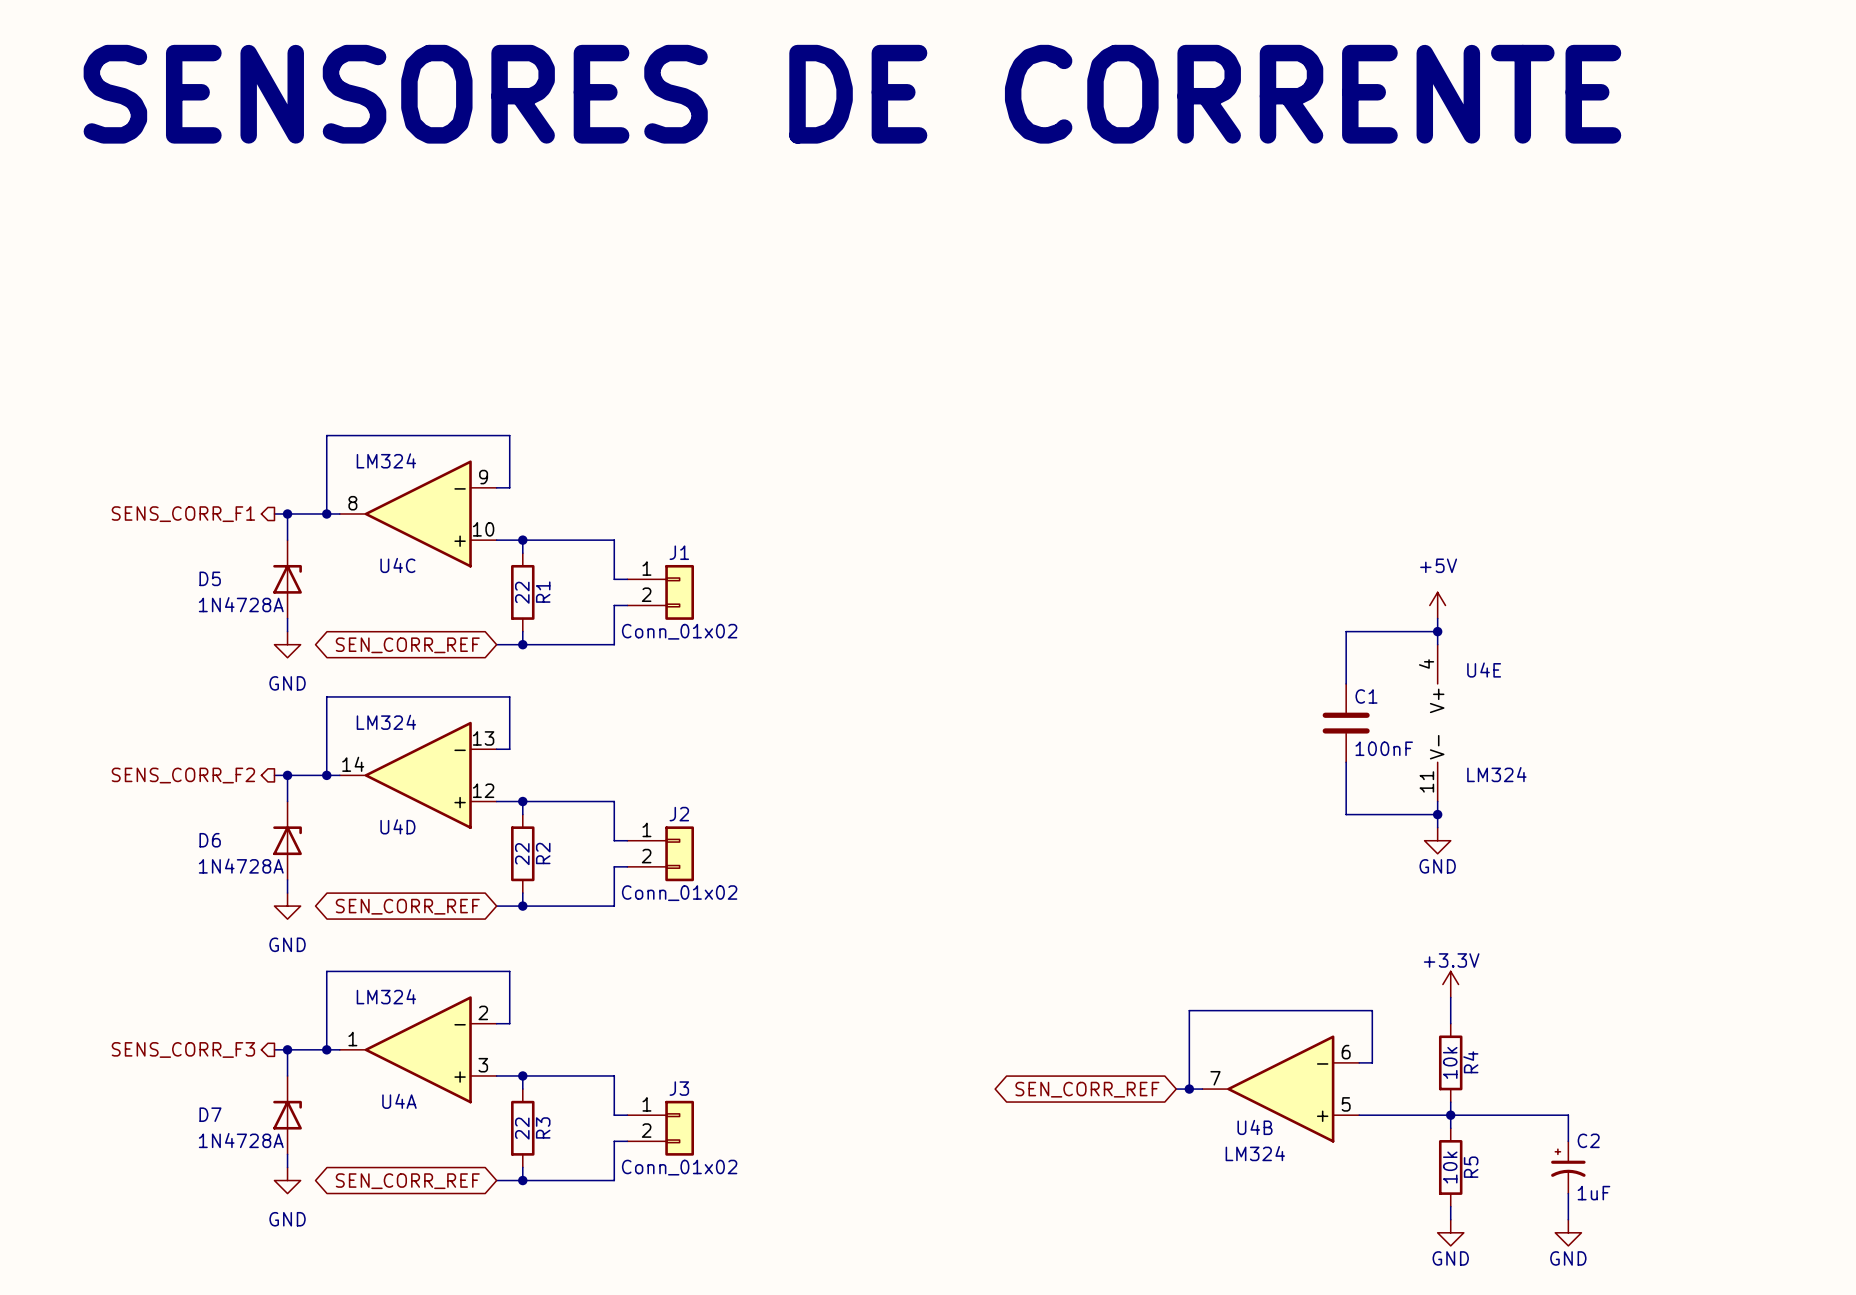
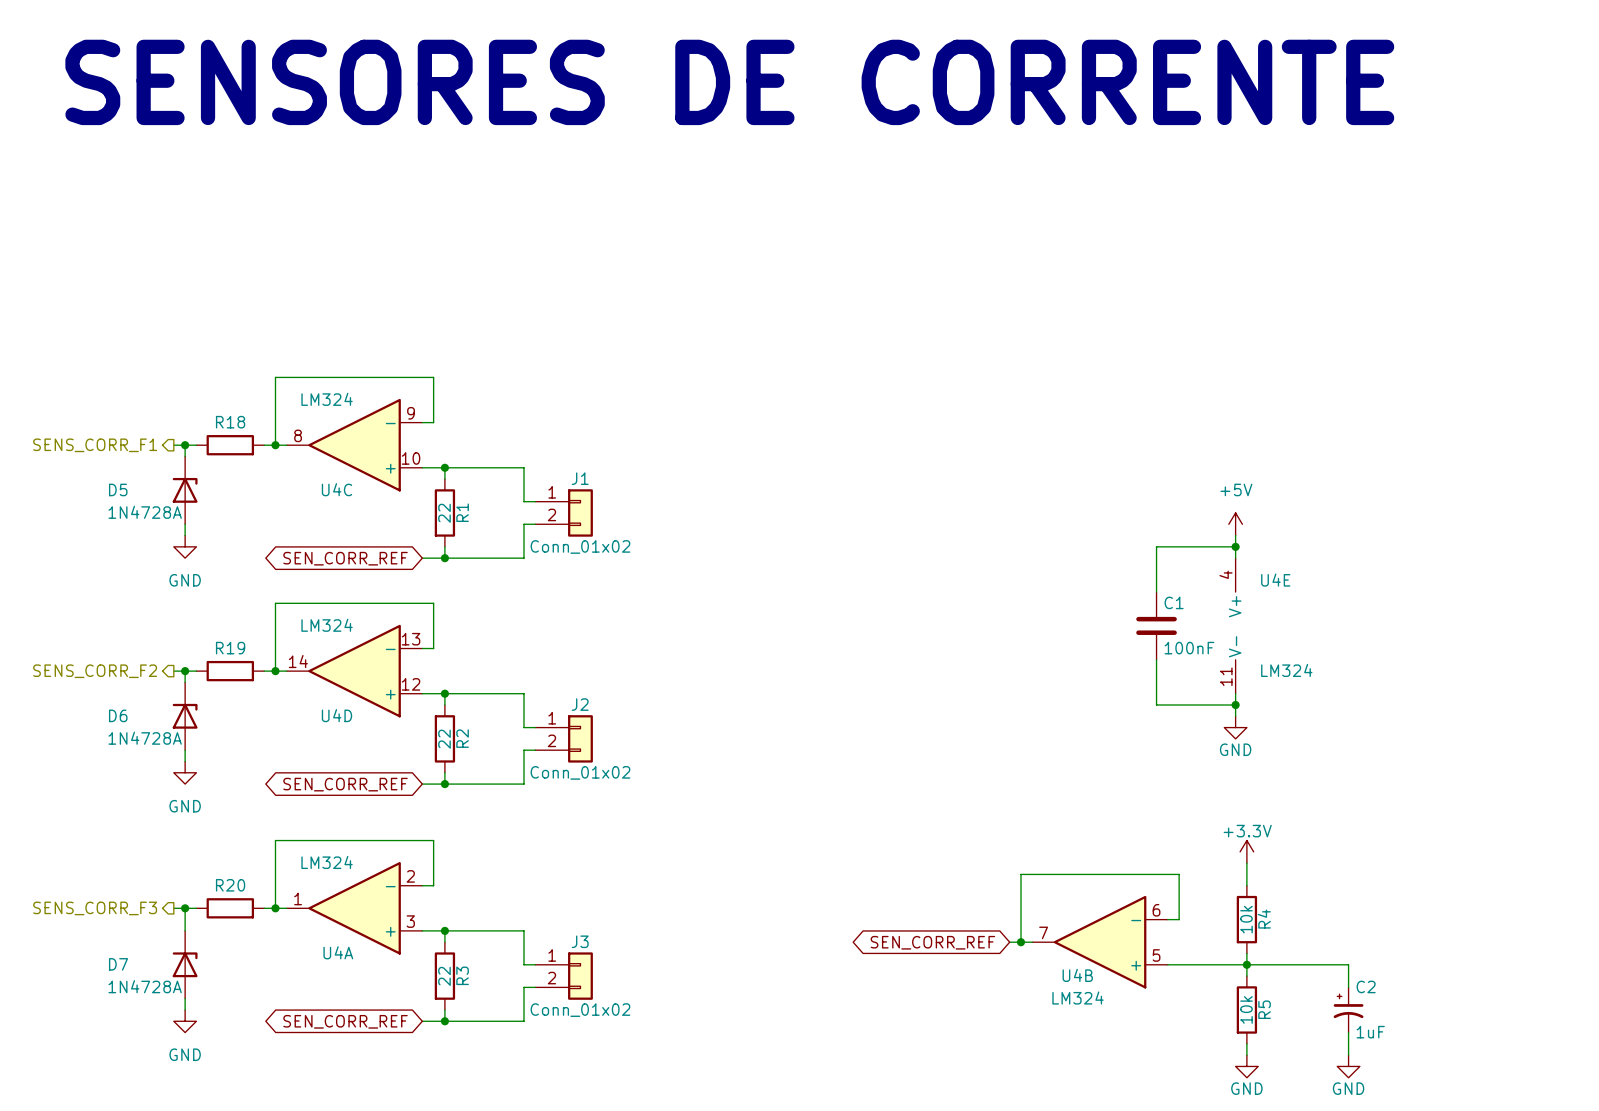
wire: none -> (173, 445) (196, 445)
wire: none -> (185, 445) (185, 456)
junction: none -> (185, 445)
wire: (274, 513) (313, 513) -> none
R18: none -> (230, 445)
wire: (287, 513) (287, 540) -> none
junction: (287, 513) -> none
hierarchical label position: SENS_CORR_F1 (183, 514) -> SENS_CORR_F1 (95, 445)
D5 position: (287, 579) -> (185, 490)
wire: (287, 618) (287, 631) -> (185, 524) (185, 535)
power symbol position: GND (287, 644) -> GND (185, 546)
hierarchical label position: SENS_CORR_F2 (183, 775) -> SENS_CORR_F2 (95, 671)
wire: none -> (173, 671) (196, 671)
wire: none -> (185, 671) (185, 682)
junction: none -> (185, 671)
wire: (274, 775) (313, 775) -> none
R19: none -> (230, 671)
wire: (287, 775) (287, 801) -> none
junction: (287, 775) -> none
D6 position: (287, 840) -> (185, 716)
wire: (287, 879) (287, 893) -> (185, 750) (185, 761)
power symbol position: GND (287, 906) -> GND (185, 772)
hierarchical label position: SENS_CORR_F3 (183, 1049) -> SENS_CORR_F3 (95, 908)
wire: none -> (173, 908) (196, 908)
junction: none -> (185, 908)
wire: (274, 1049) (313, 1049) -> none
R20: none -> (230, 908)
wire: (287, 1049) (287, 1075) -> (185, 908) (185, 930)
junction: (287, 1049) -> none
D7 position: (287, 1115) -> (185, 964)
wire: (287, 1154) (287, 1167) -> (185, 998) (185, 1009)
power symbol position: GND (287, 1180) -> GND (185, 1021)

